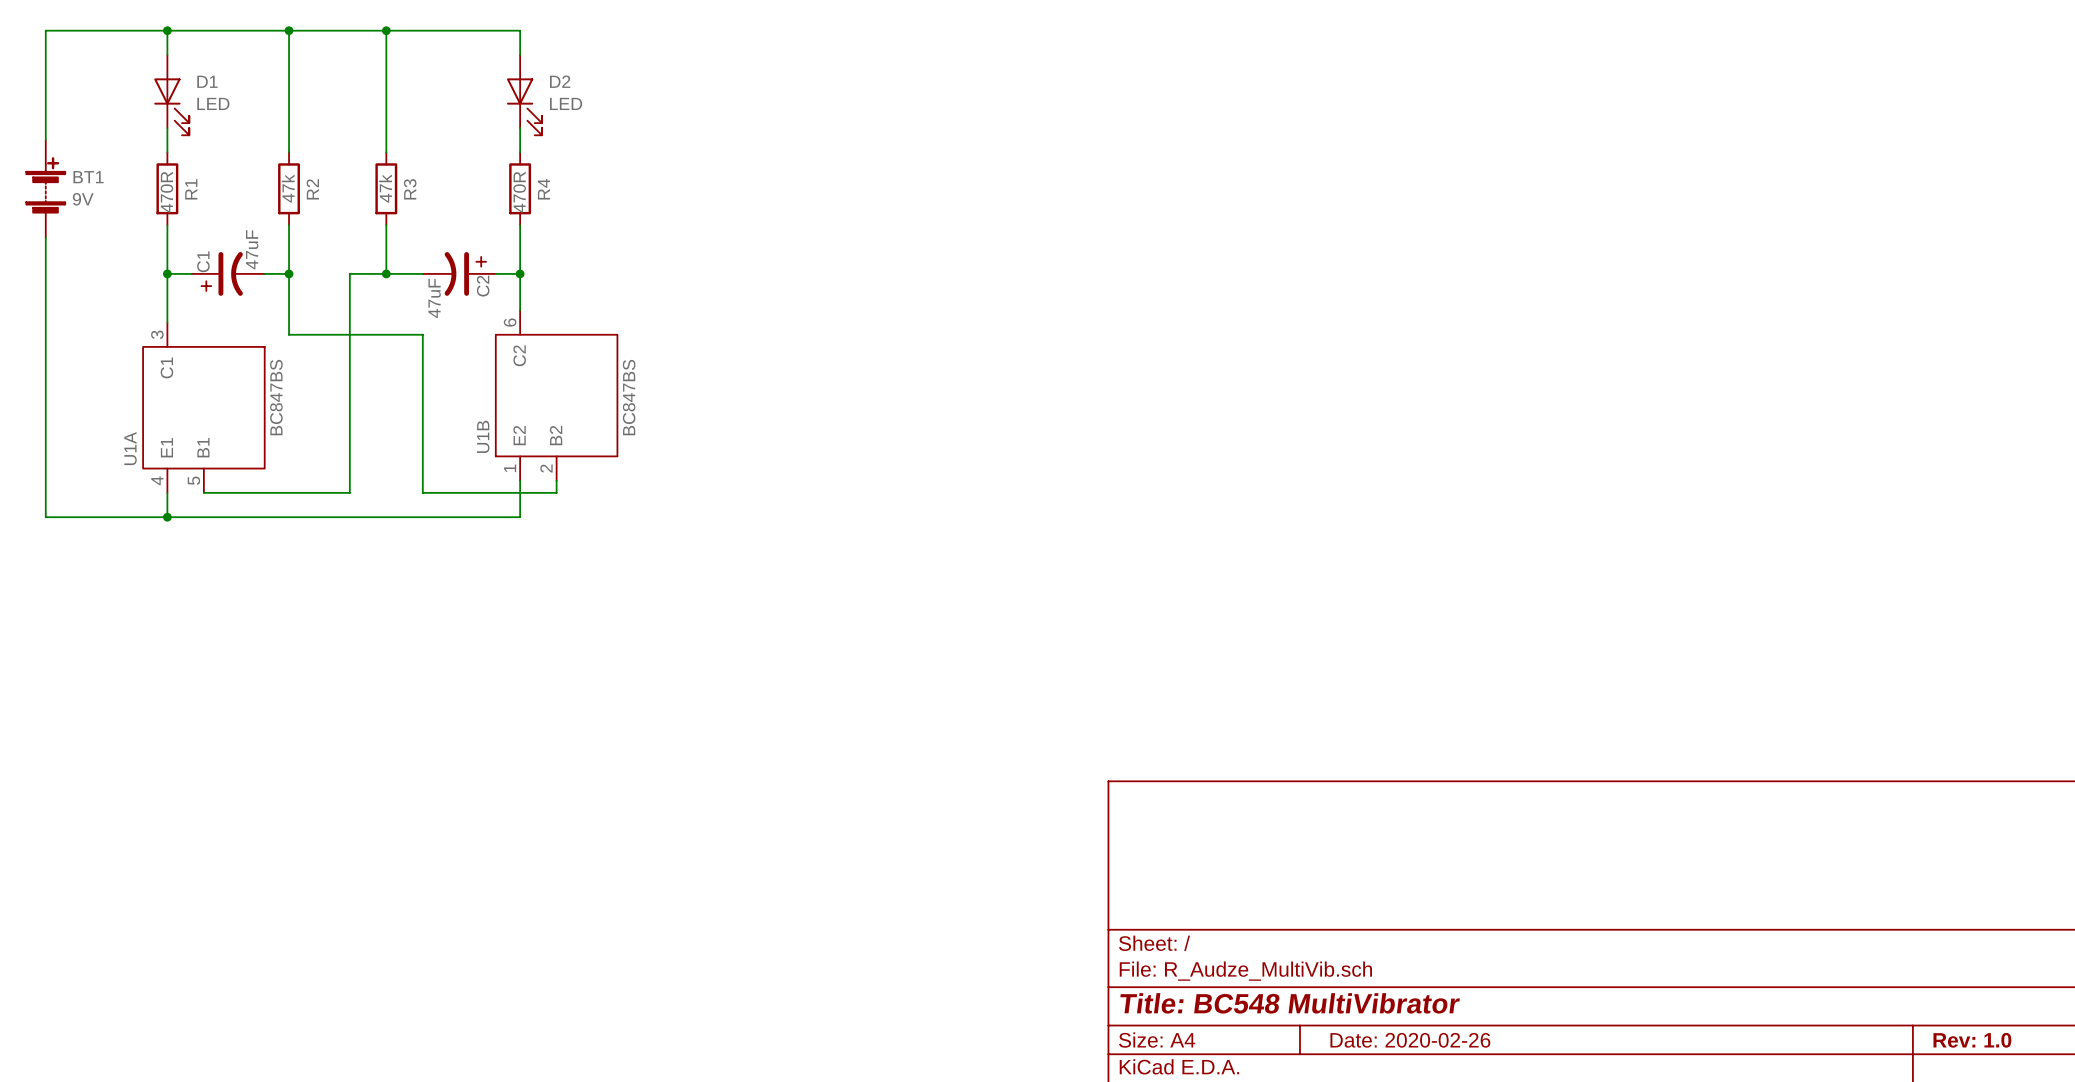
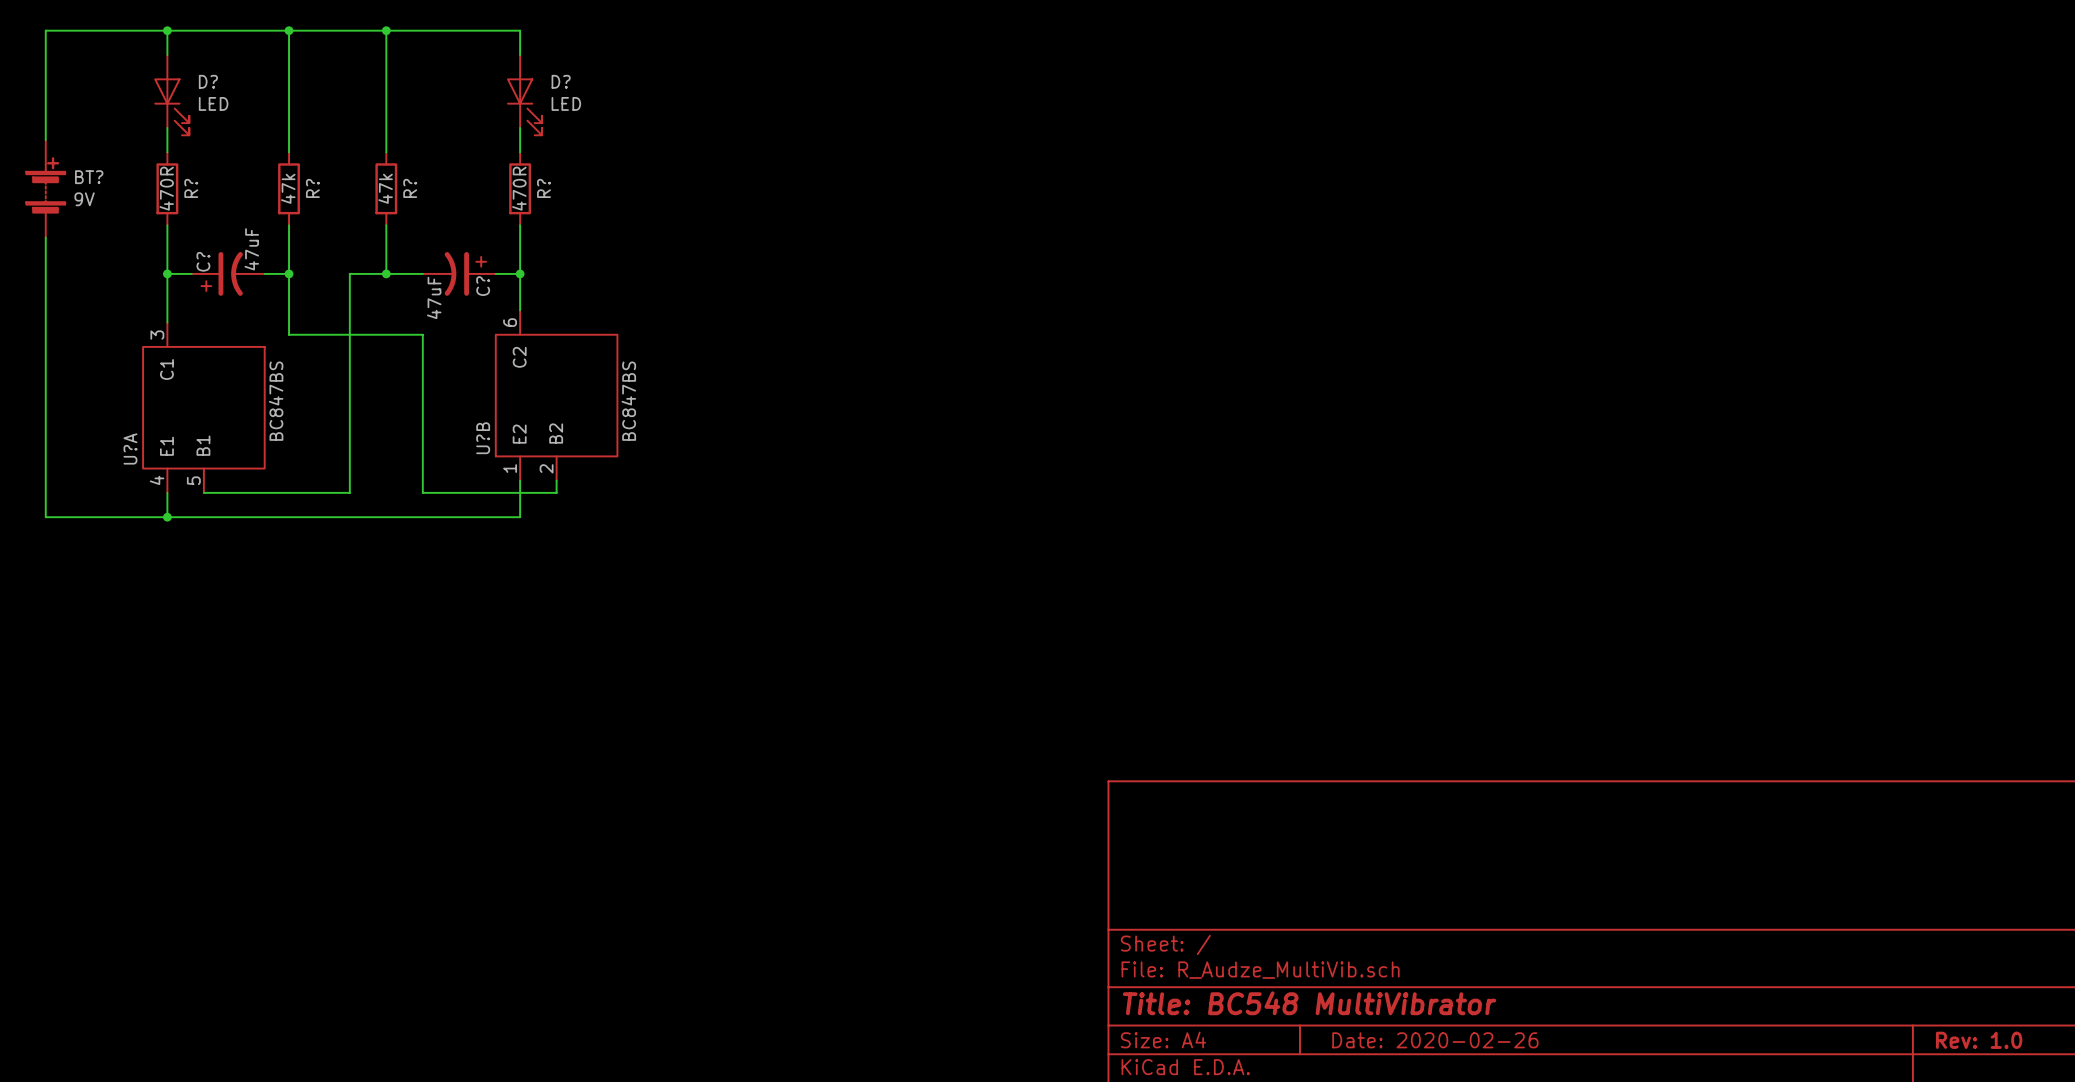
D1 name: D1 (207, 81) -> D? (208, 81)
D2 name: D2 (560, 81) -> D? (561, 81)
BT1 name: BT1 (88, 177) -> BT? (89, 177)
R1 name: R1 (191, 189) -> R? (191, 188)
R2 name: R2 (312, 189) -> R? (312, 188)
R3 name: R3 (410, 189) -> R? (410, 188)
R4 name: R4 (543, 189) -> R? (543, 188)
C1 name: C1 (203, 261) -> C? (203, 261)
C2 name: C2 (483, 286) -> C? (483, 286)
U1B name: U1B (483, 436) -> U?B (483, 438)
U1A name: U1A (130, 448) -> U?A (130, 448)

